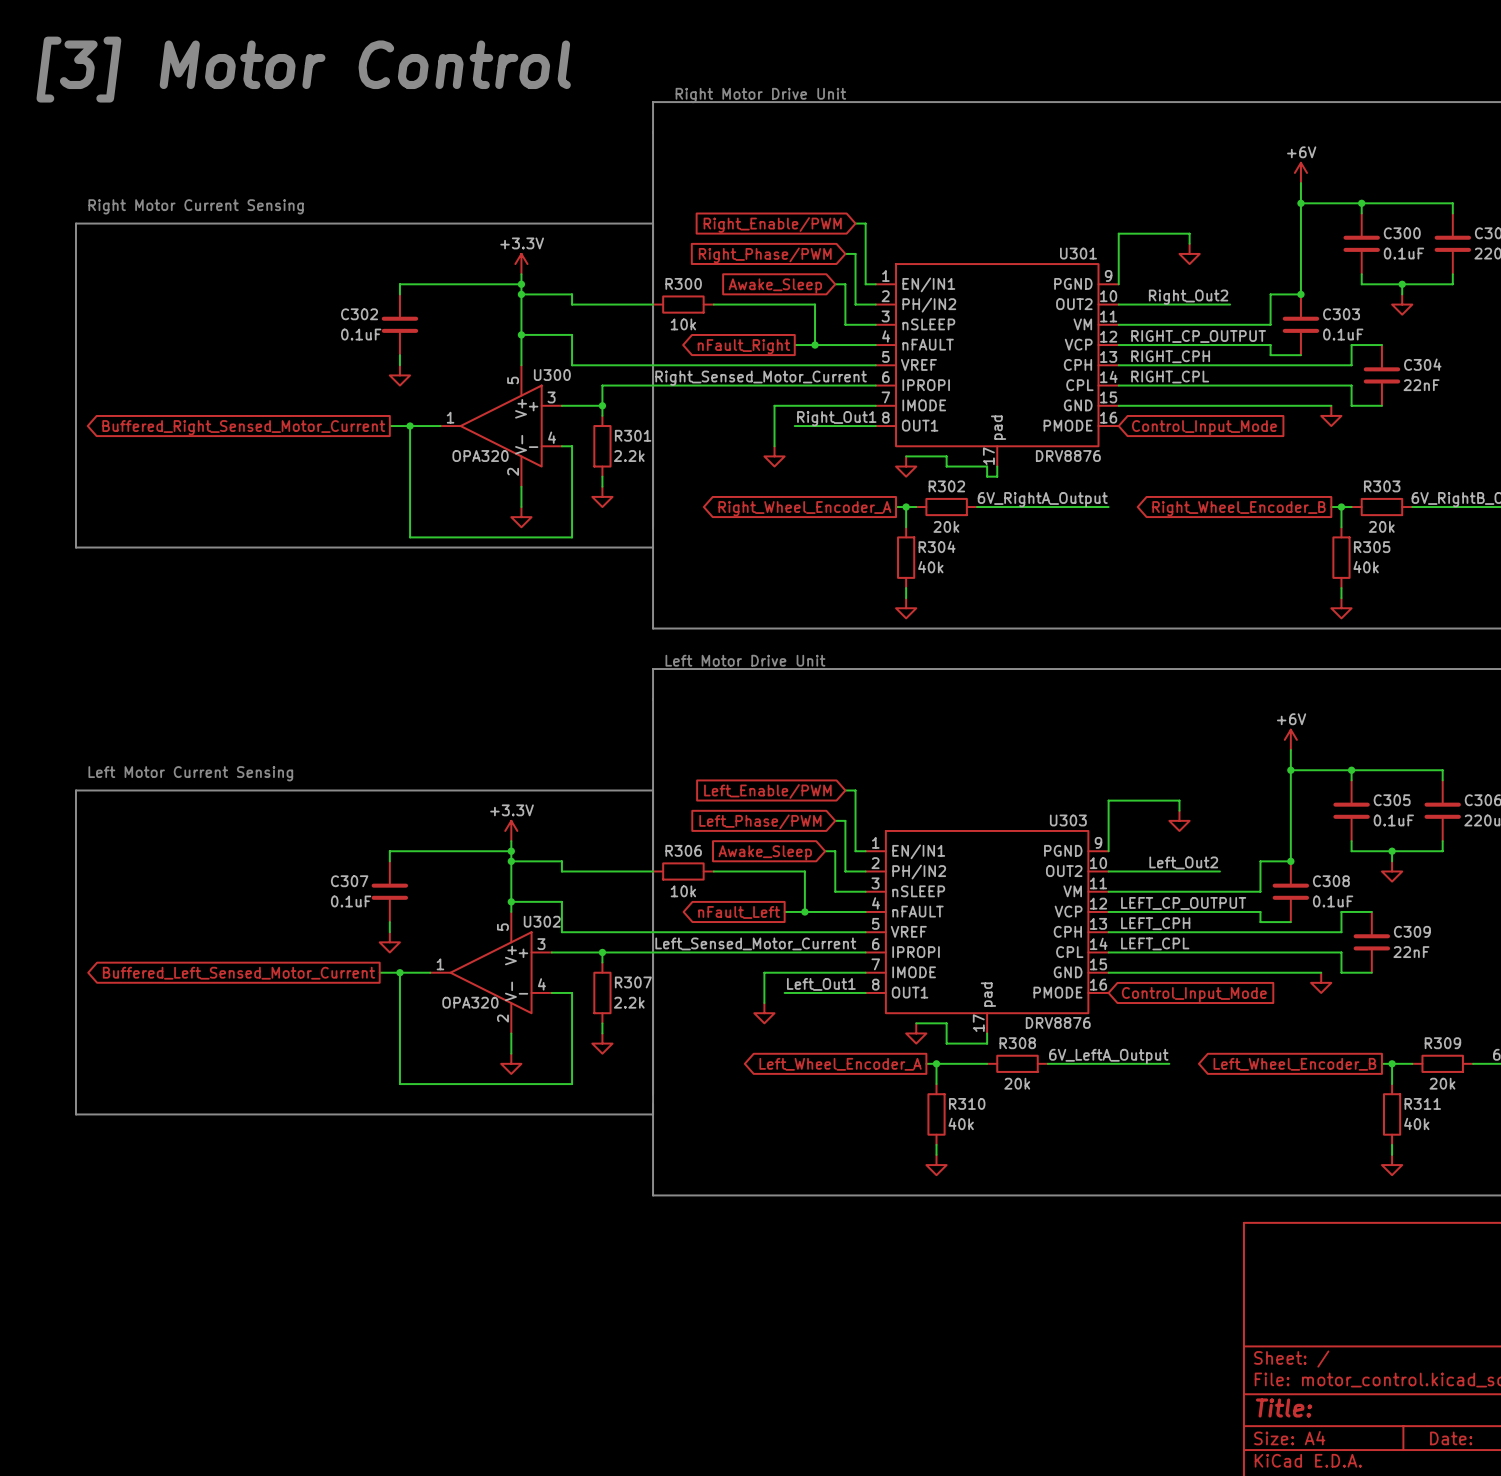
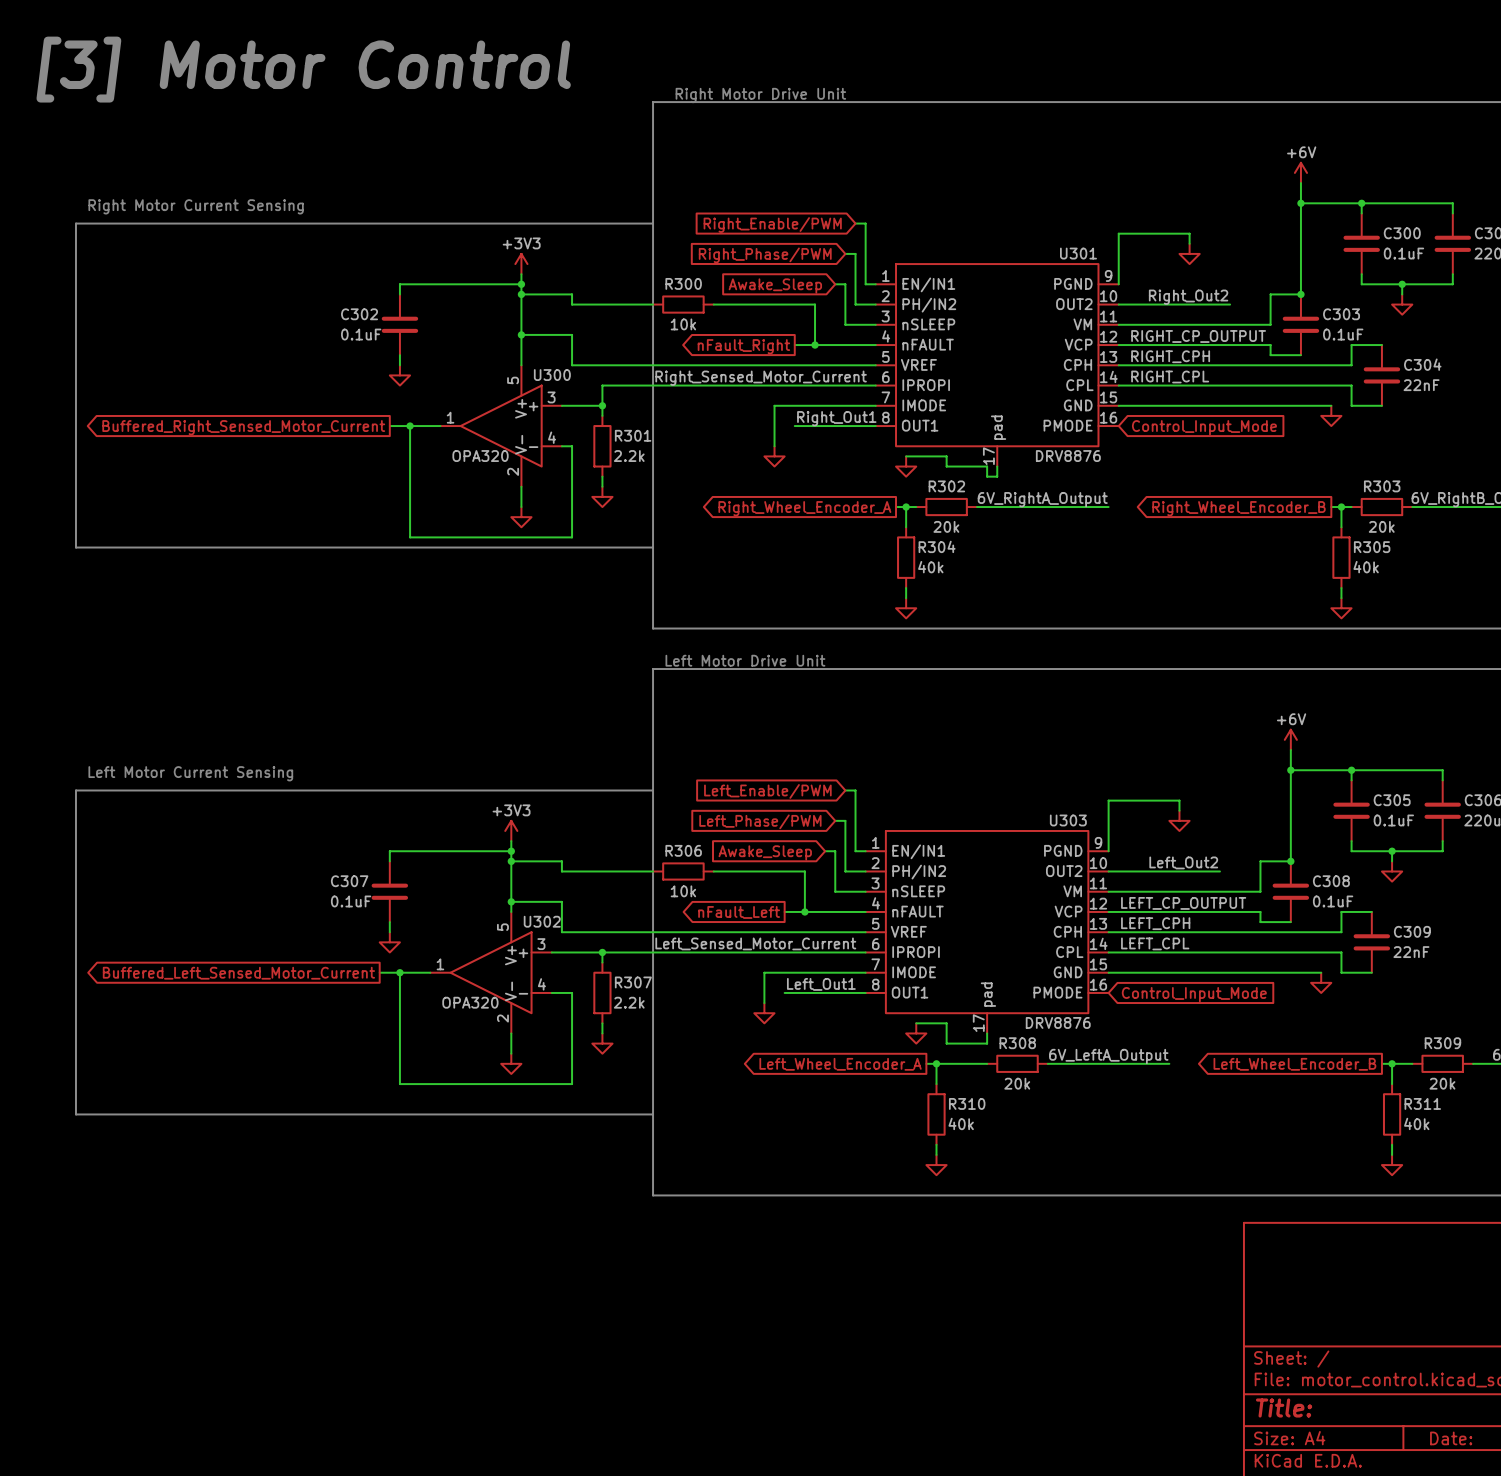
power symbol: +3.3V (521, 264) -> +3V3 (521, 264)
power symbol: +3.3V (511, 830) -> +3V3 (511, 830)

